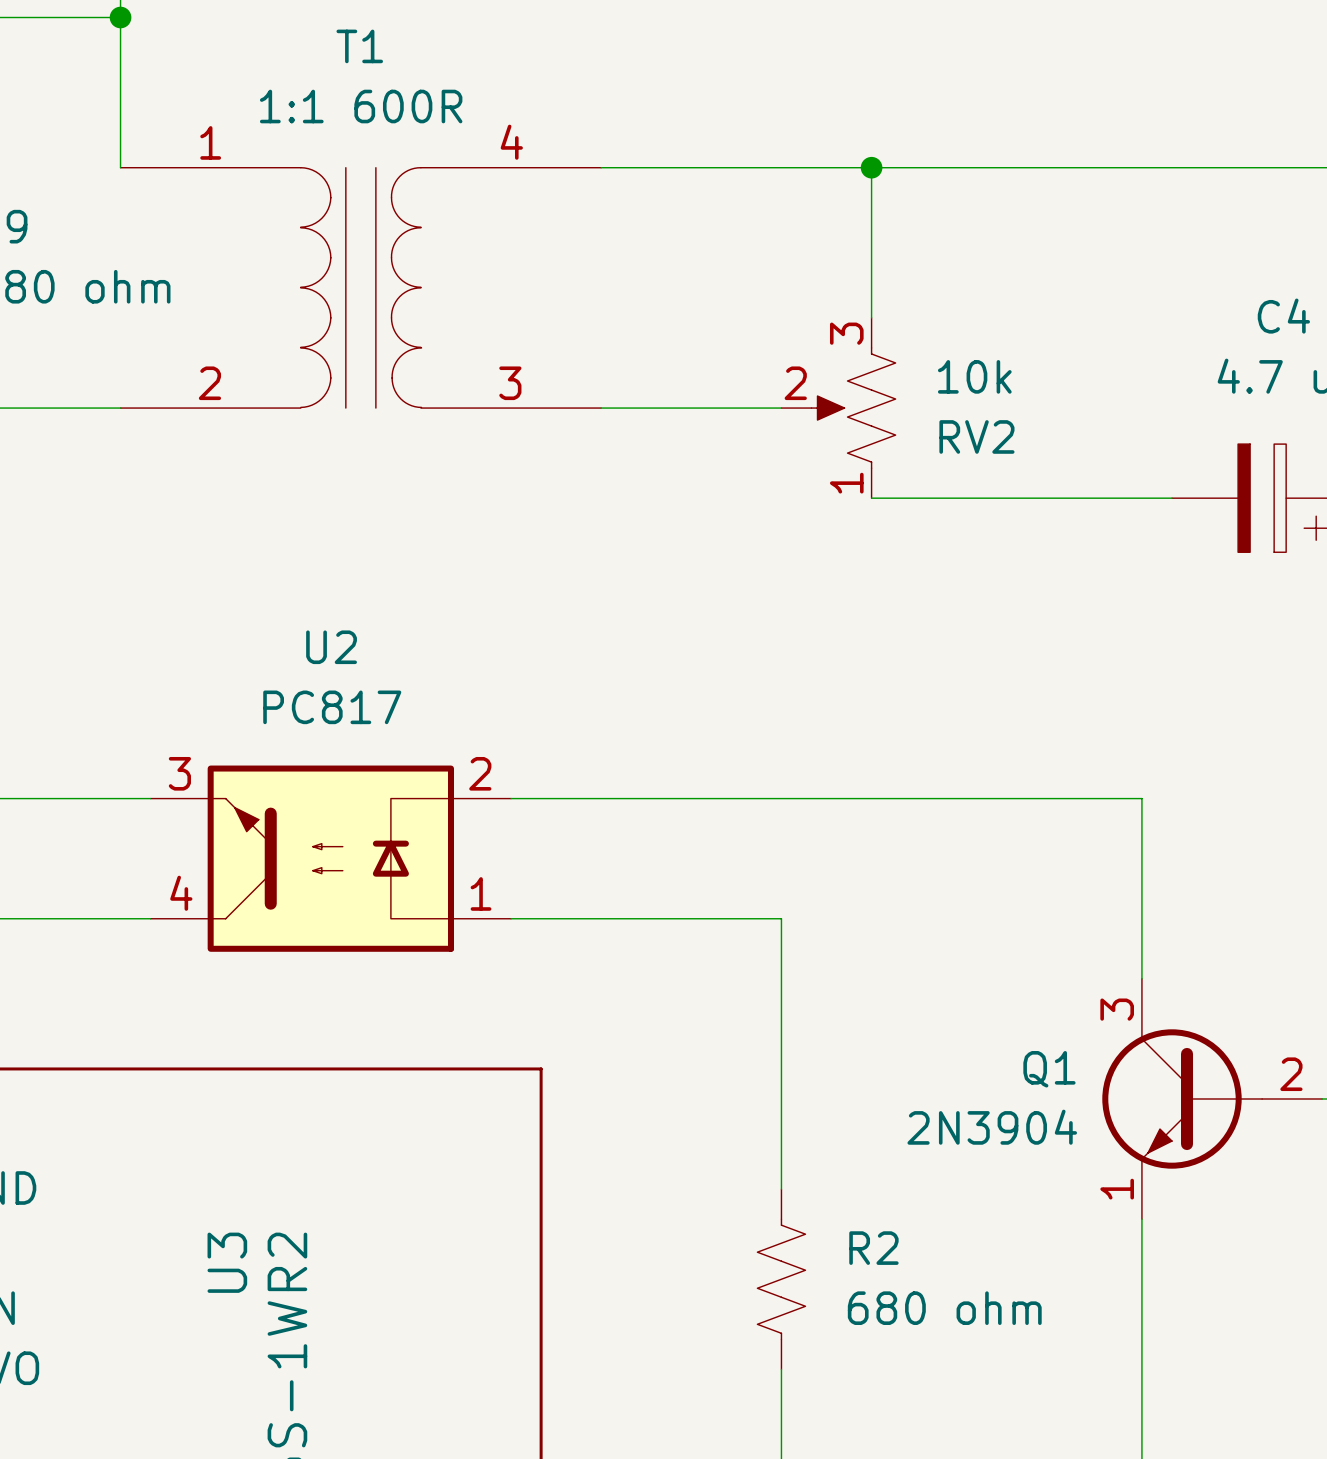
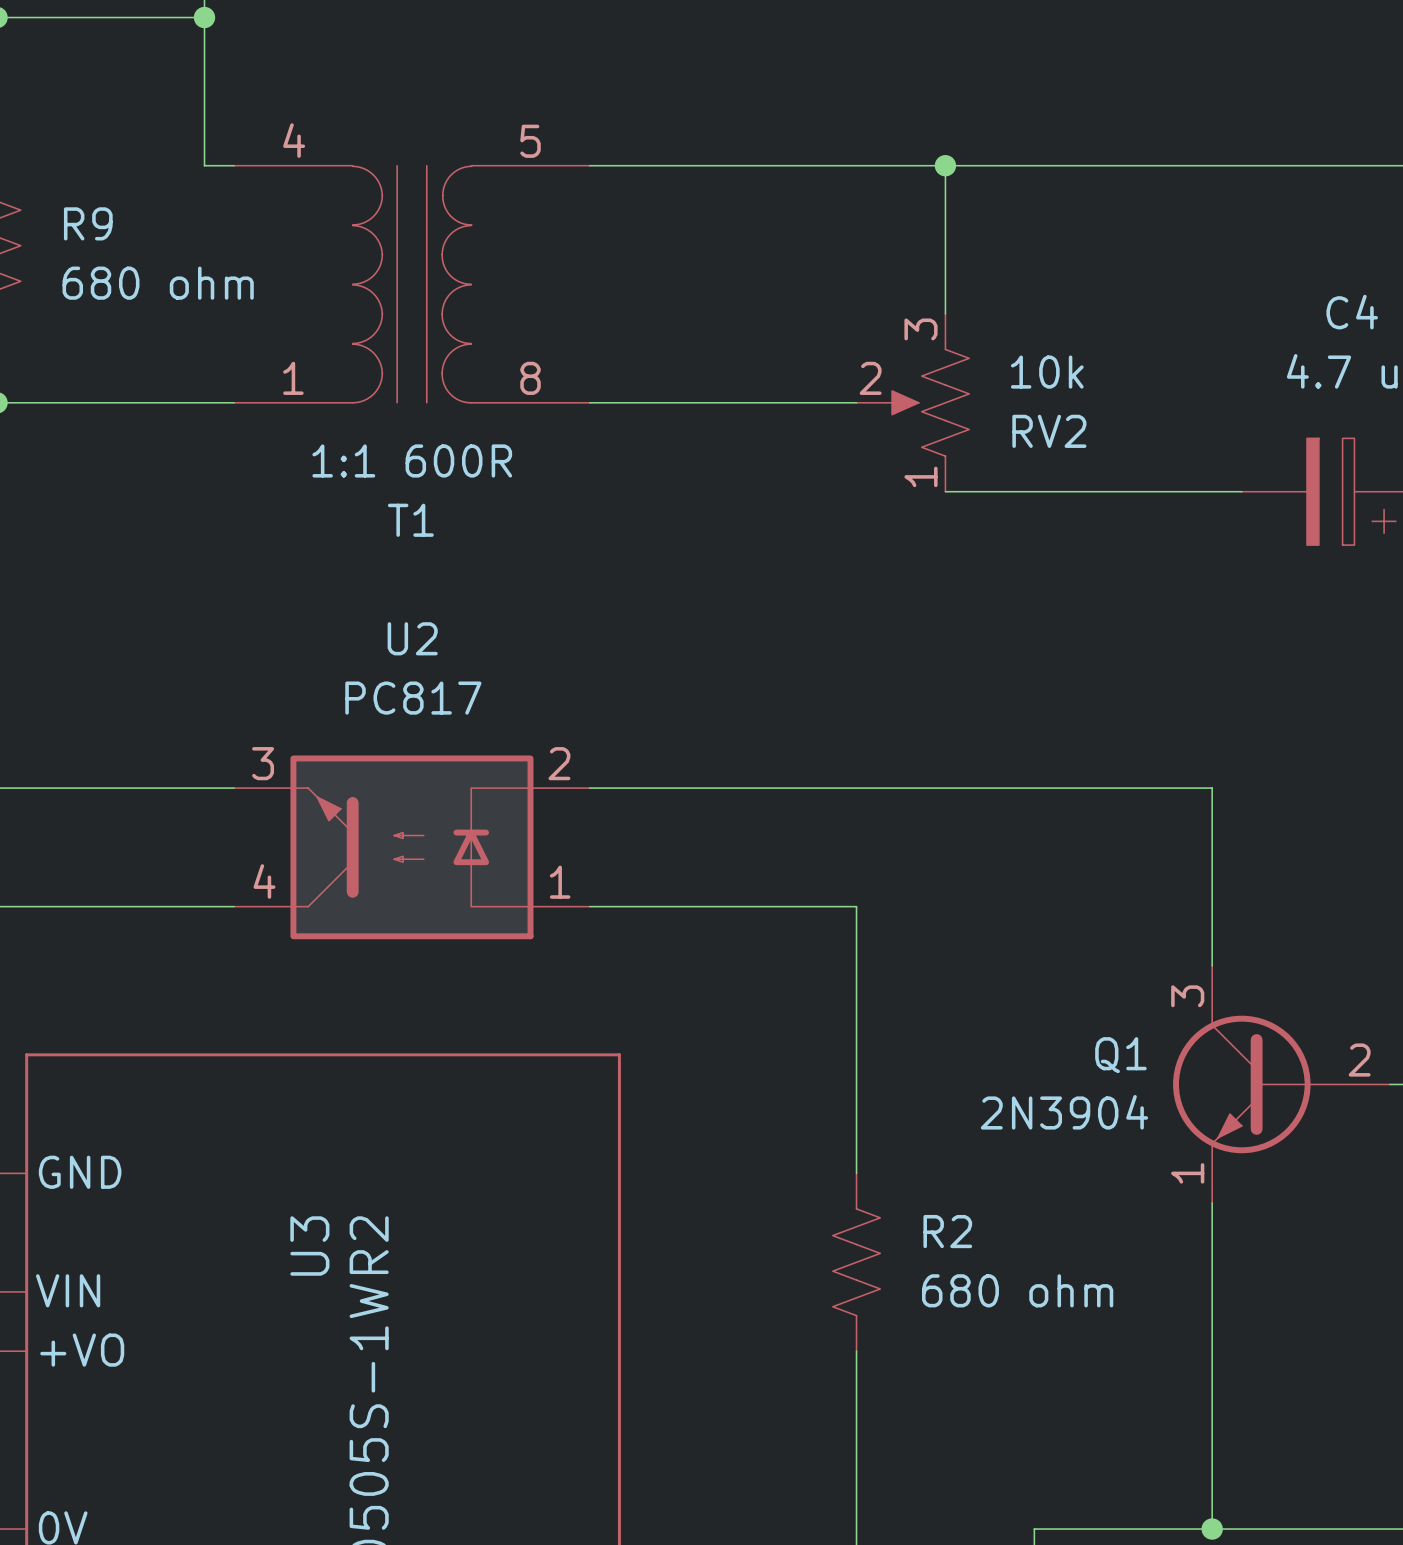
T1 name position: T1 (359, 46) -> T1 (410, 520)
T1 value position: 1:1 600R (361, 106) -> 1:1 600R (412, 460)
T1 symbol: [120, 167, 602, 409] -> [234, 165, 590, 403]

